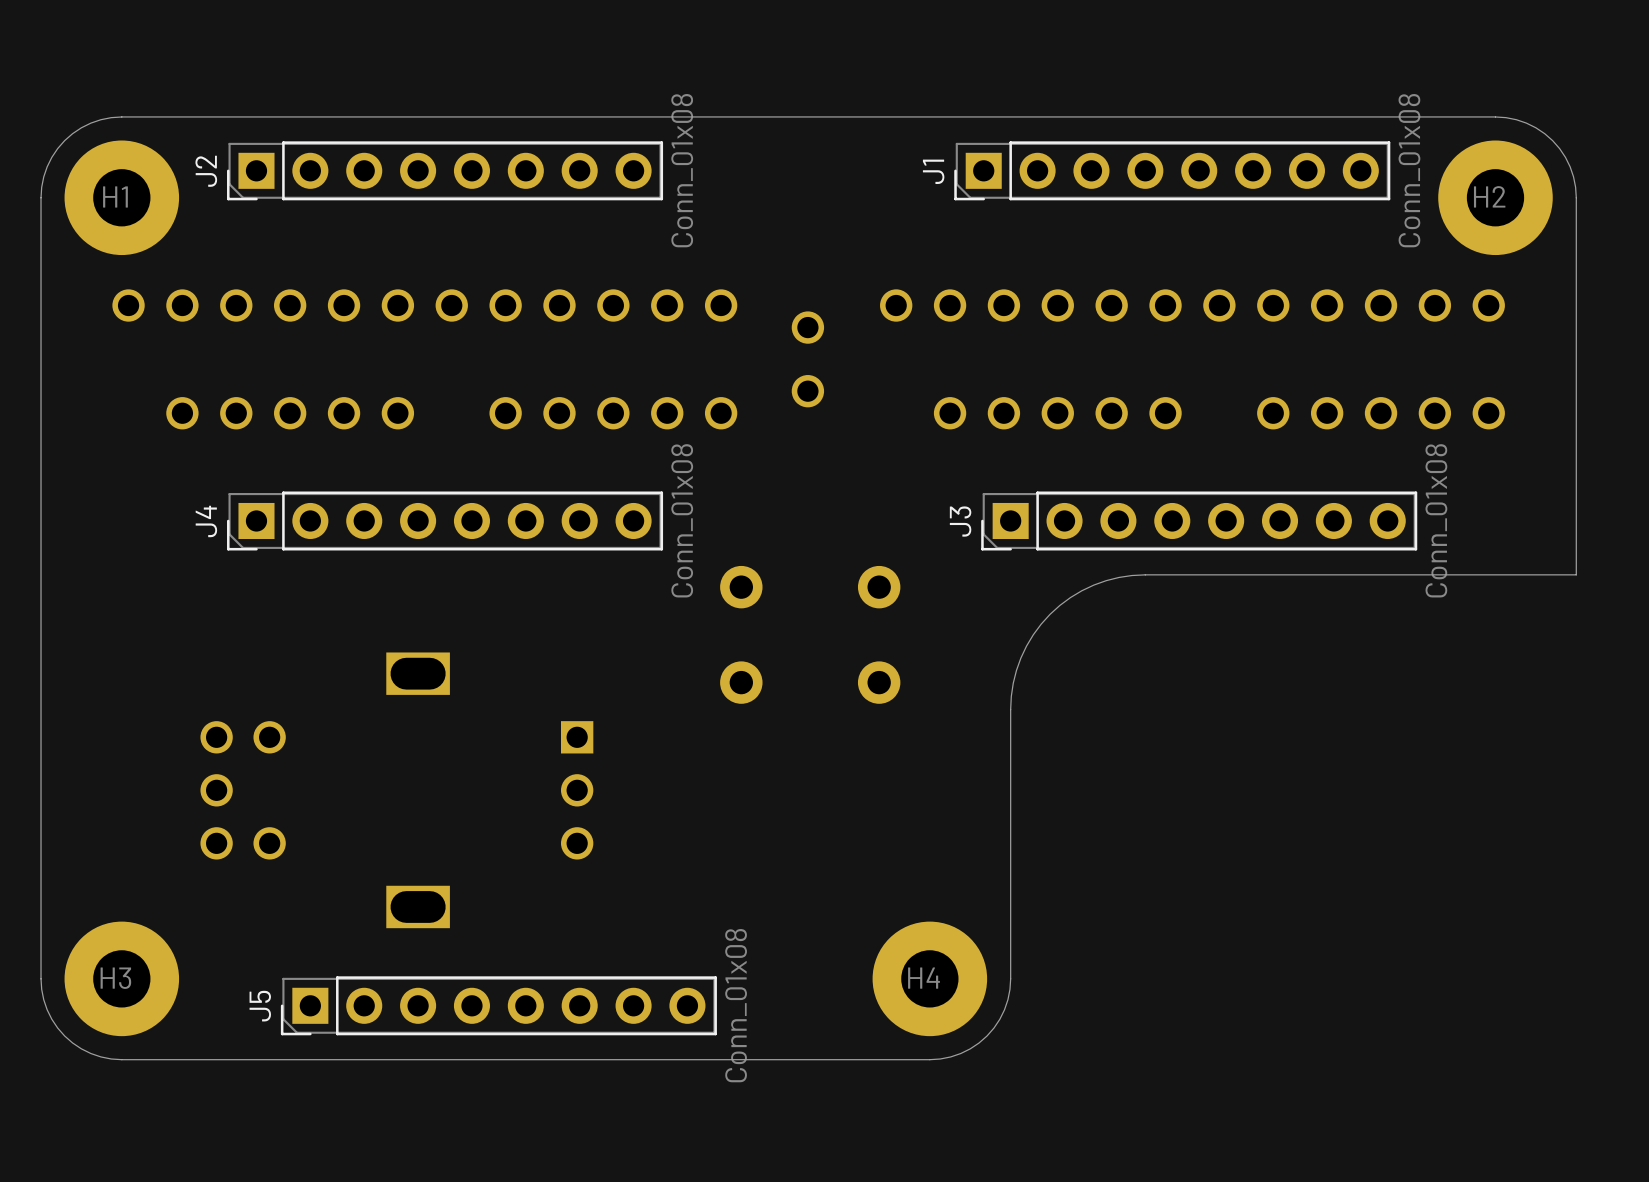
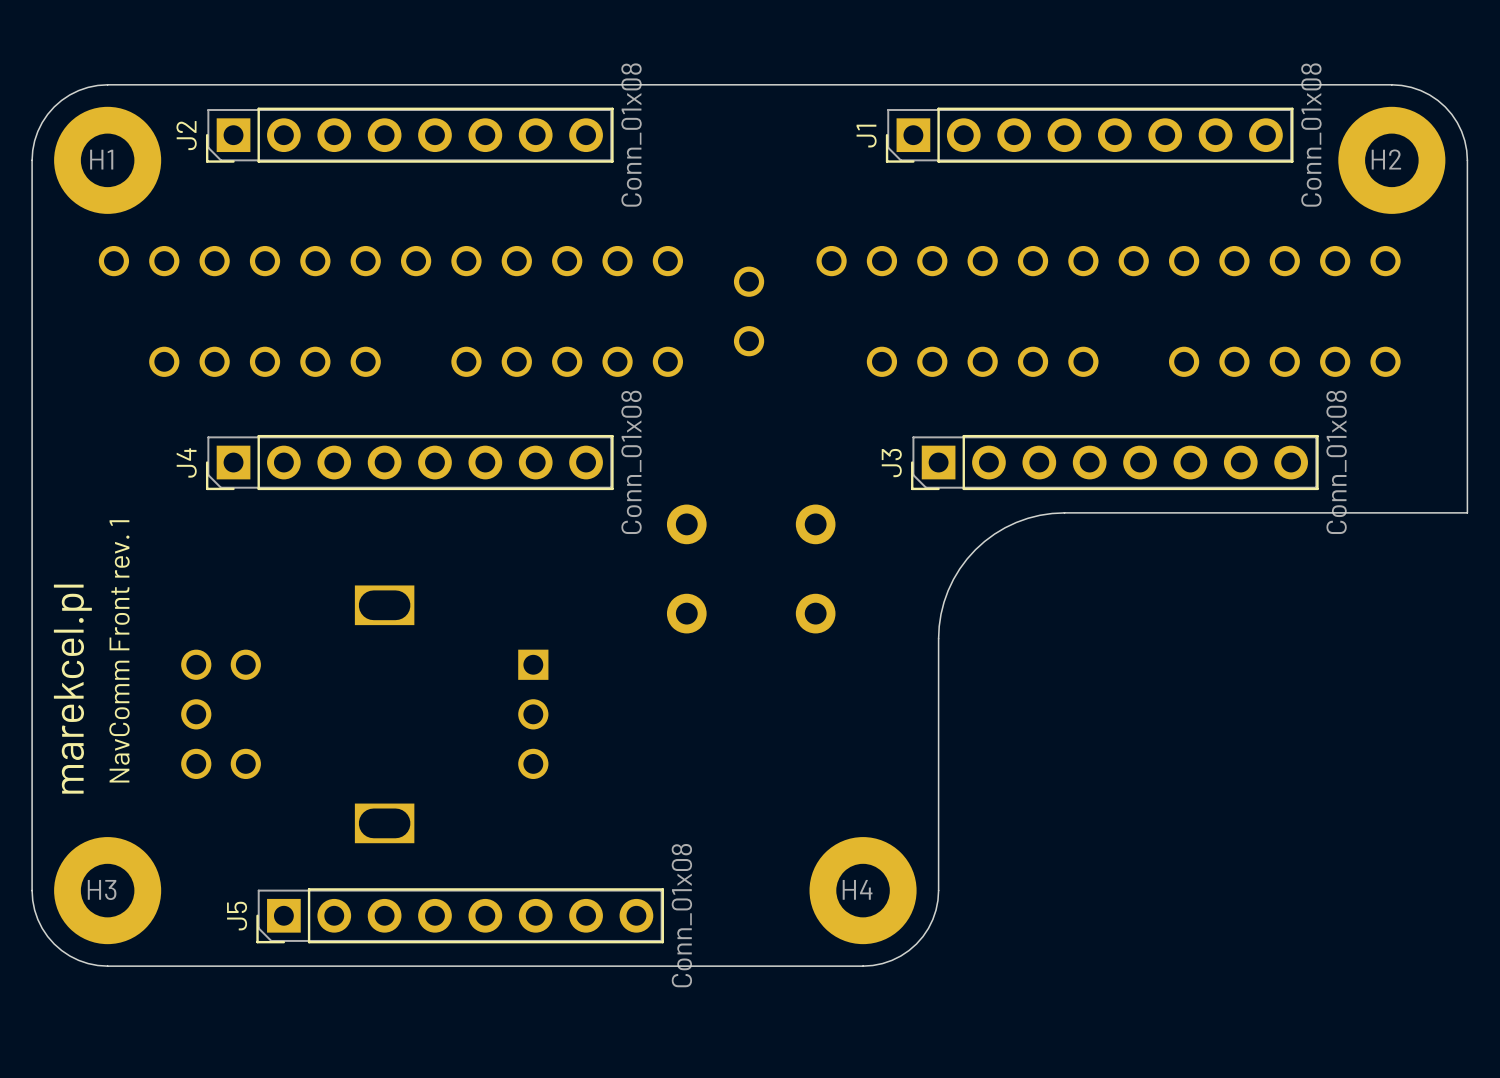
text: none -> NavComm Front rev. 1 (119, 651)
text: none -> marekcel.pl (72, 689)

